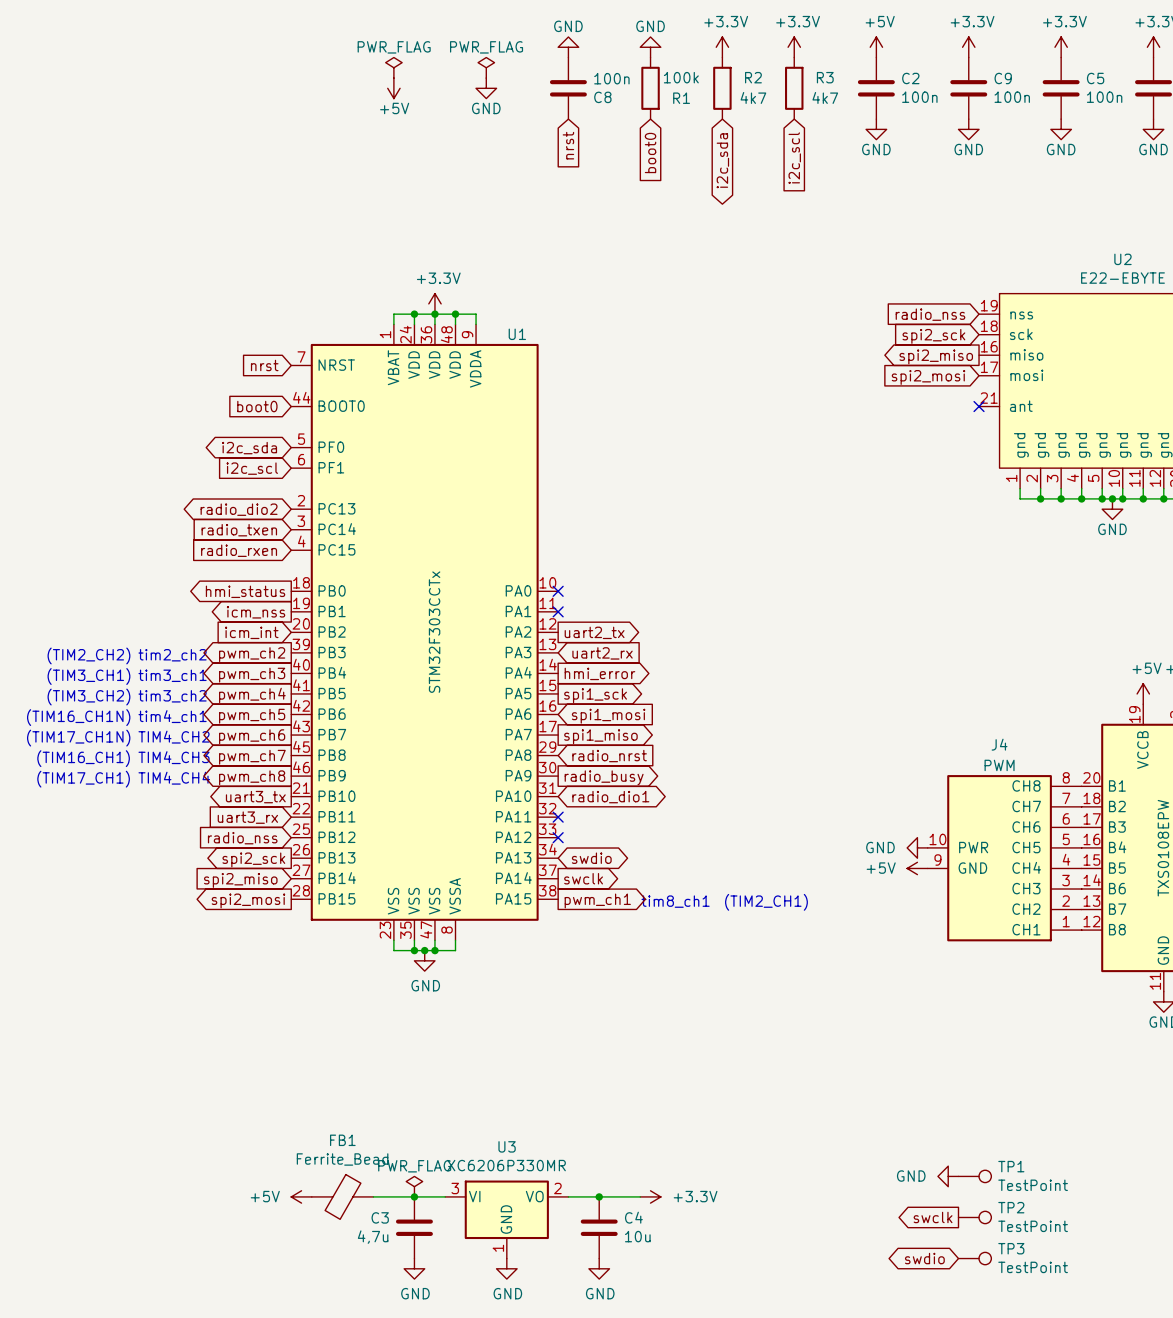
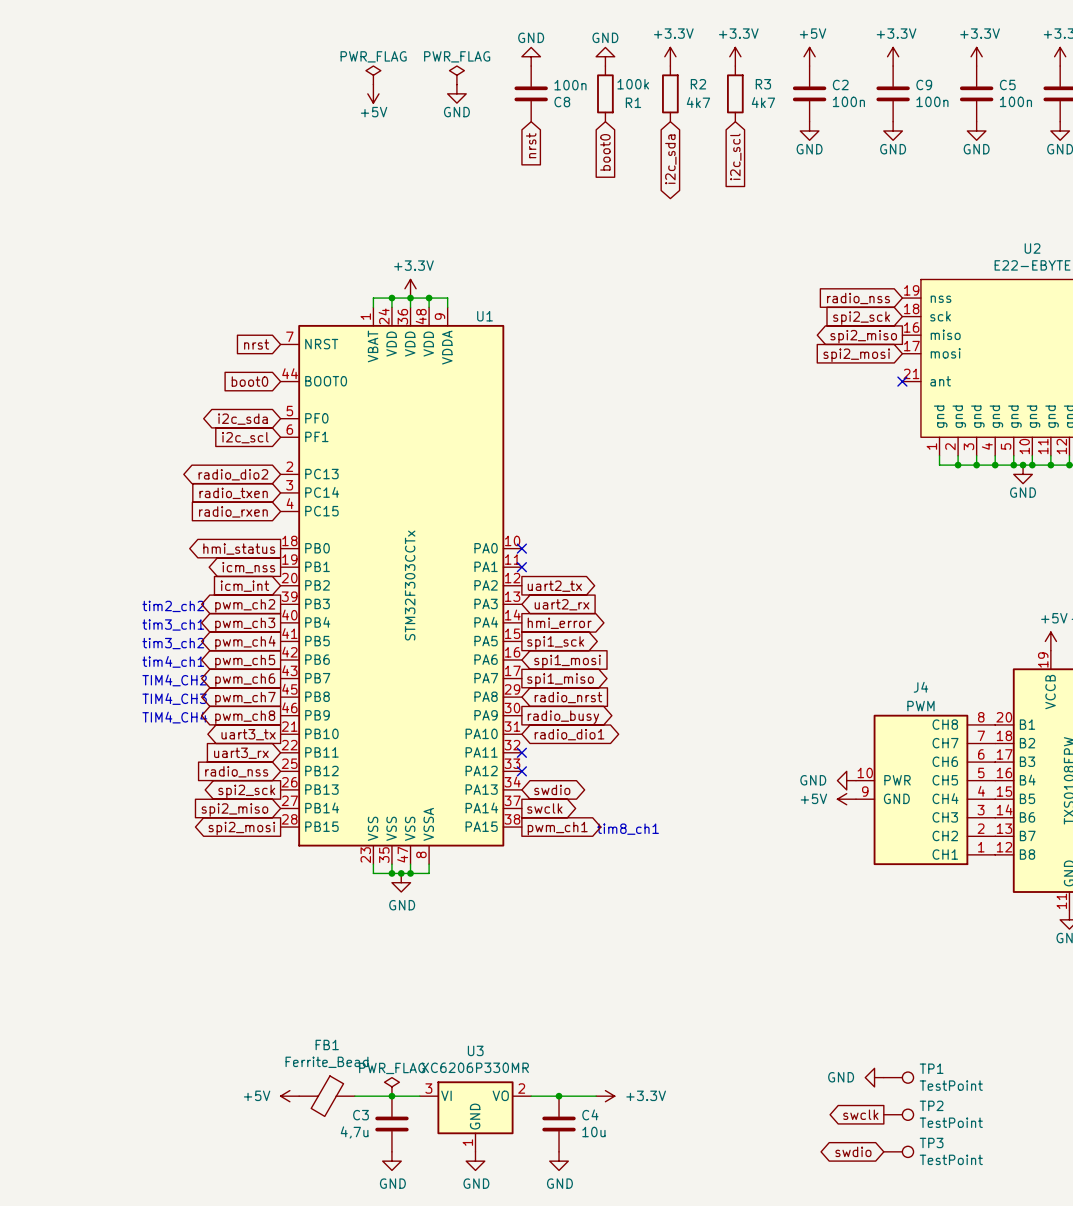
text: (TIM2_CH2) (88, 655) -> none
text: (TIM3_CH1) (88, 676) -> none
text: (TIM3_CH2) (88, 697) -> none
text: (TIM16_CH1N) (78, 717) -> none
text: (TIM17_CH1N) (78, 738) -> none
text: (TIM16_CH1) (83, 758) -> none
text: (TIM17_CH1) (83, 779) -> none
text: (TIM2_CH1) (766, 902) -> none

